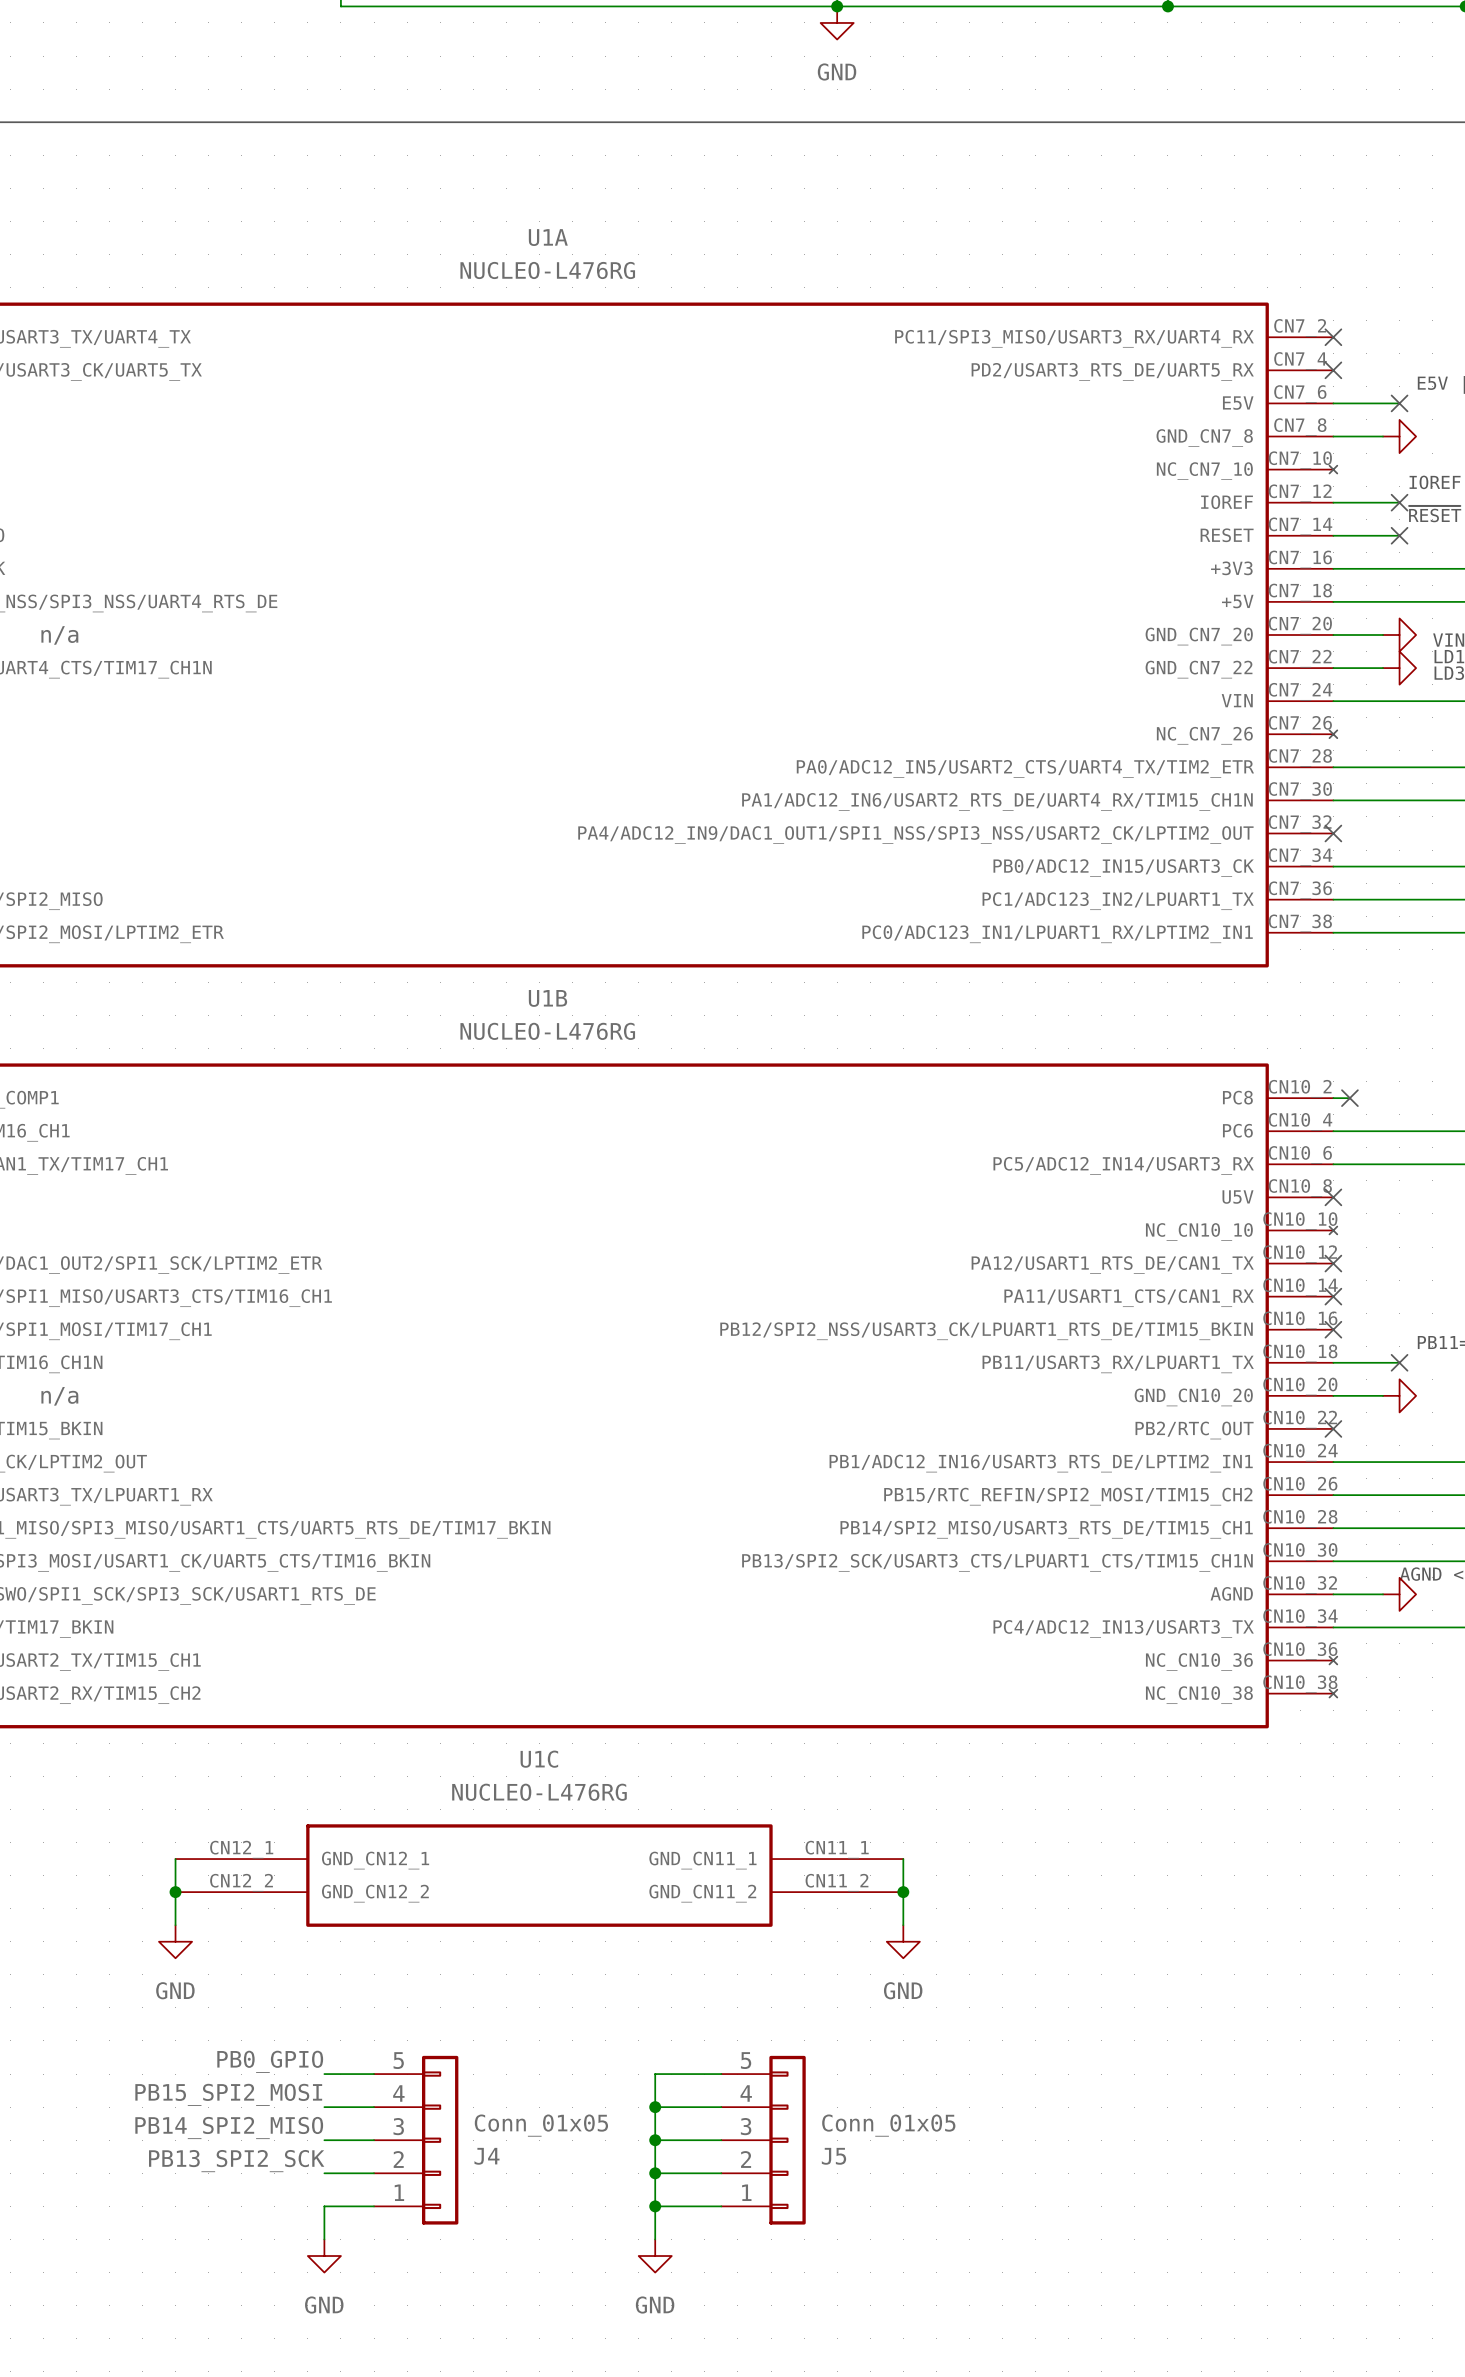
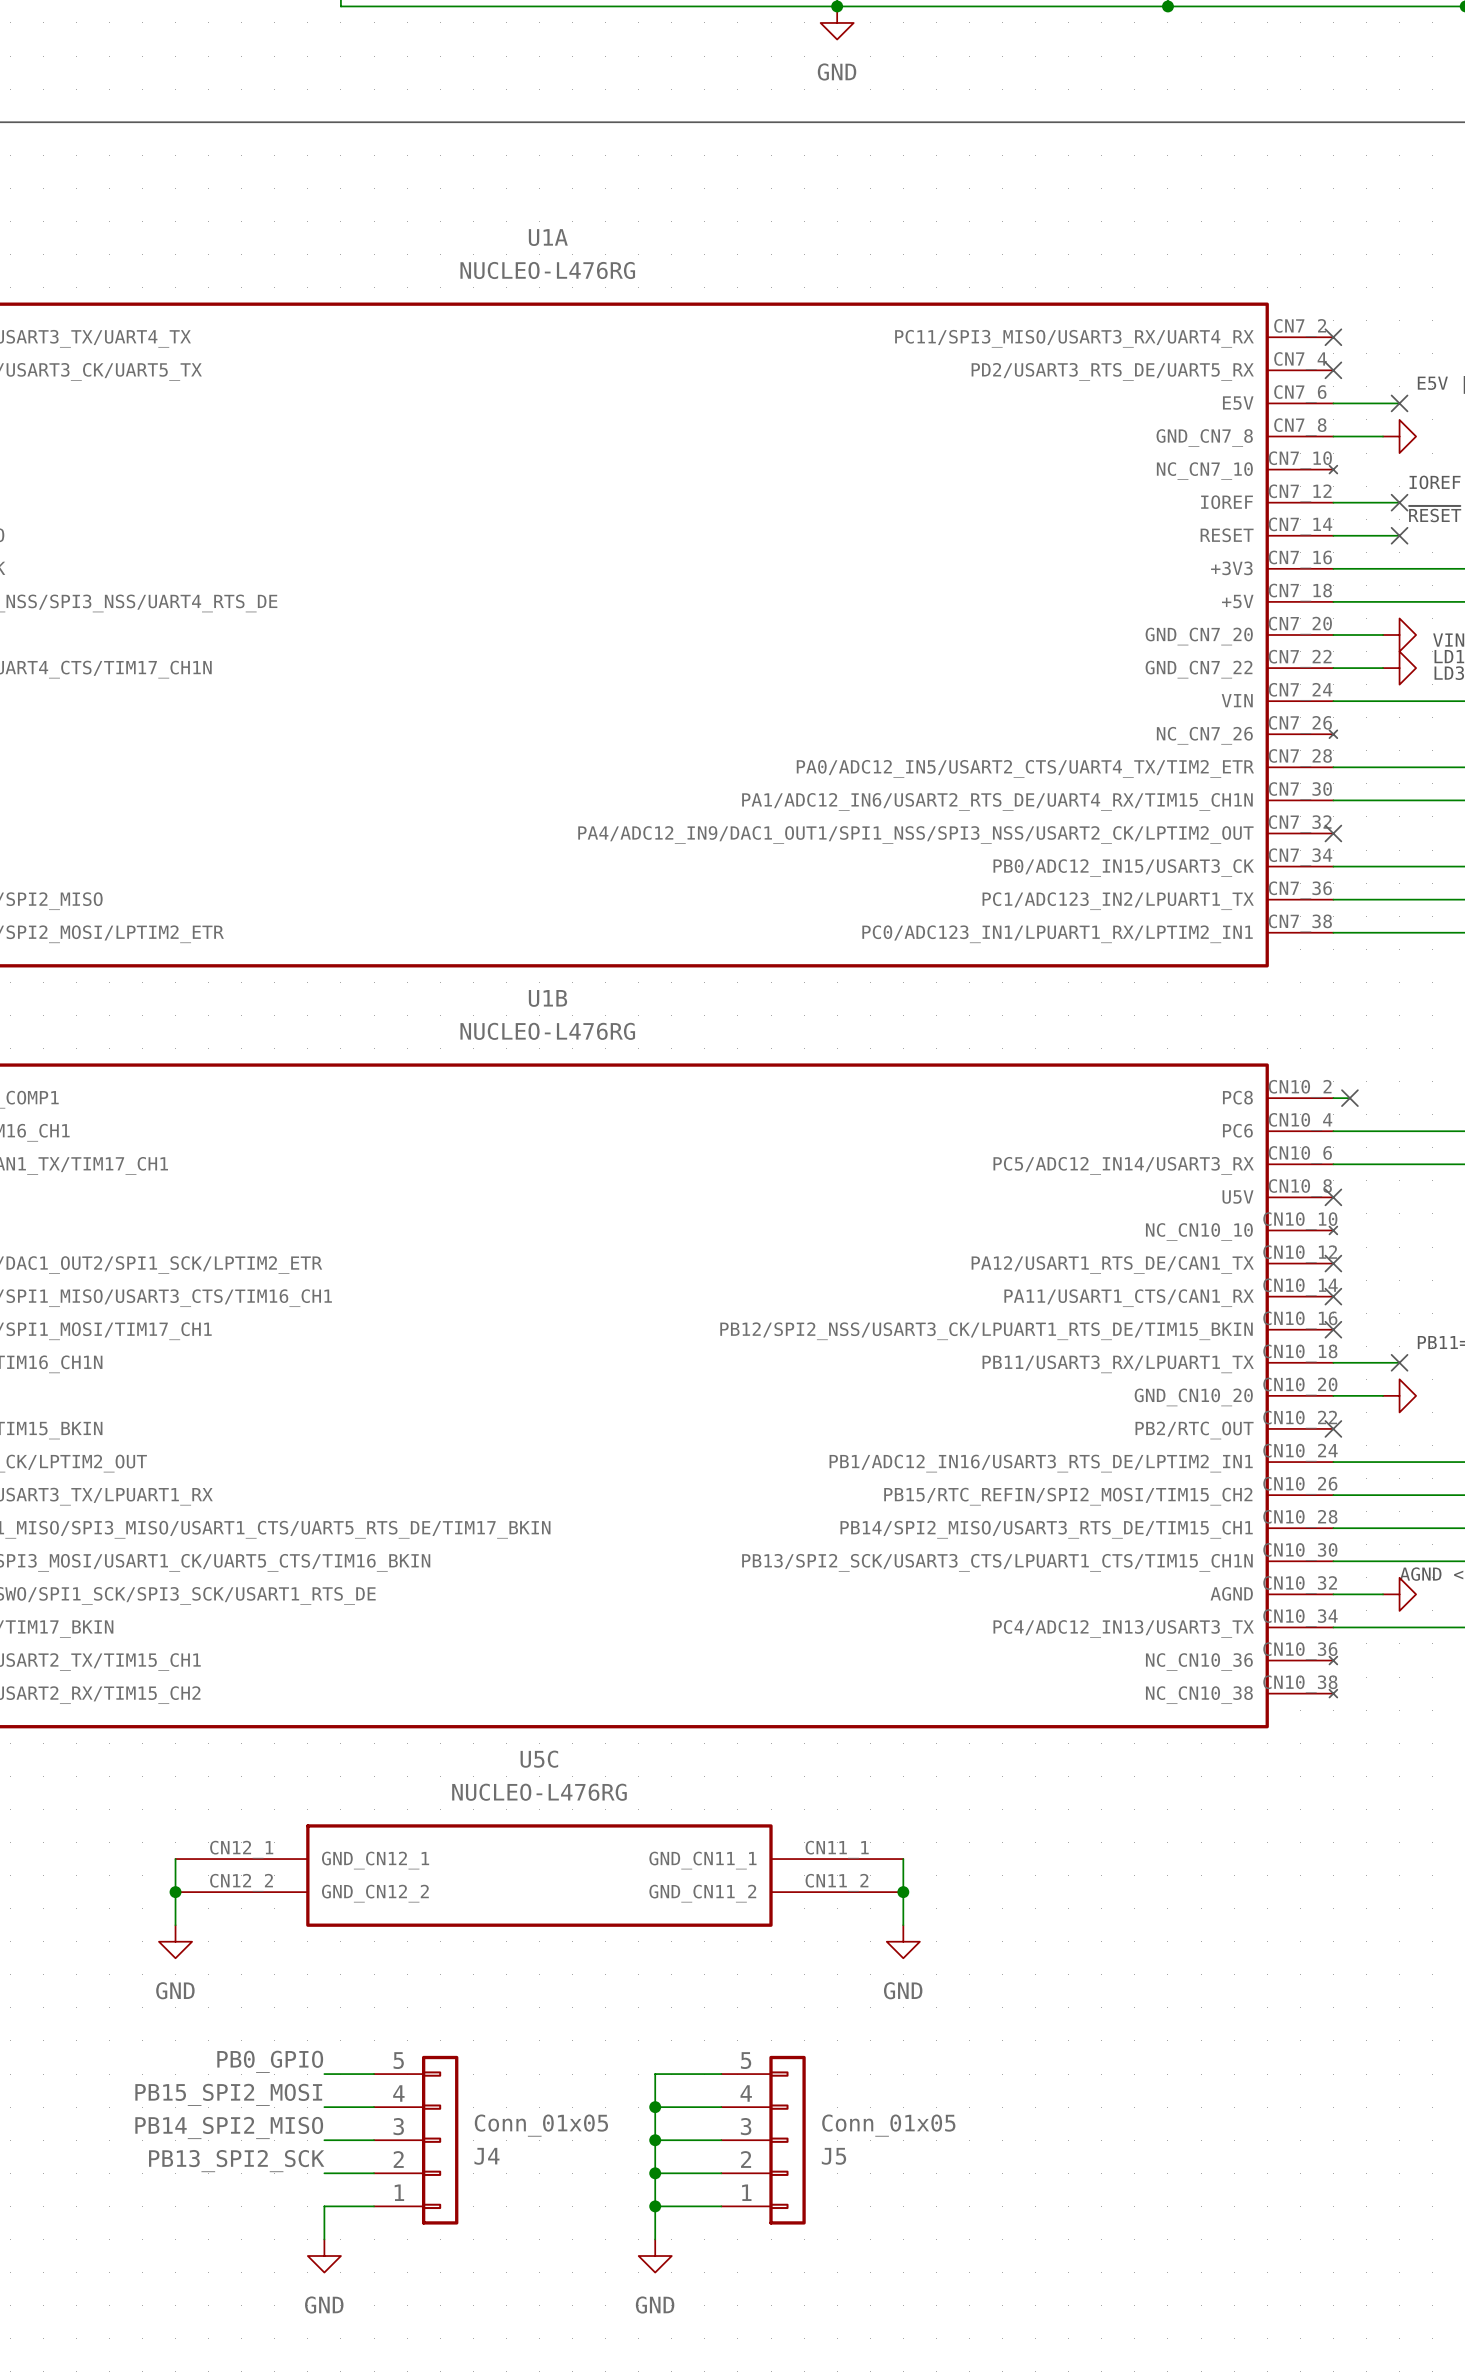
U1A text: n/a (59, 635) -> none
U1B text: n/a (59, 1396) -> none
U1C name: U1C (539, 1759) -> U5C (539, 1759)

